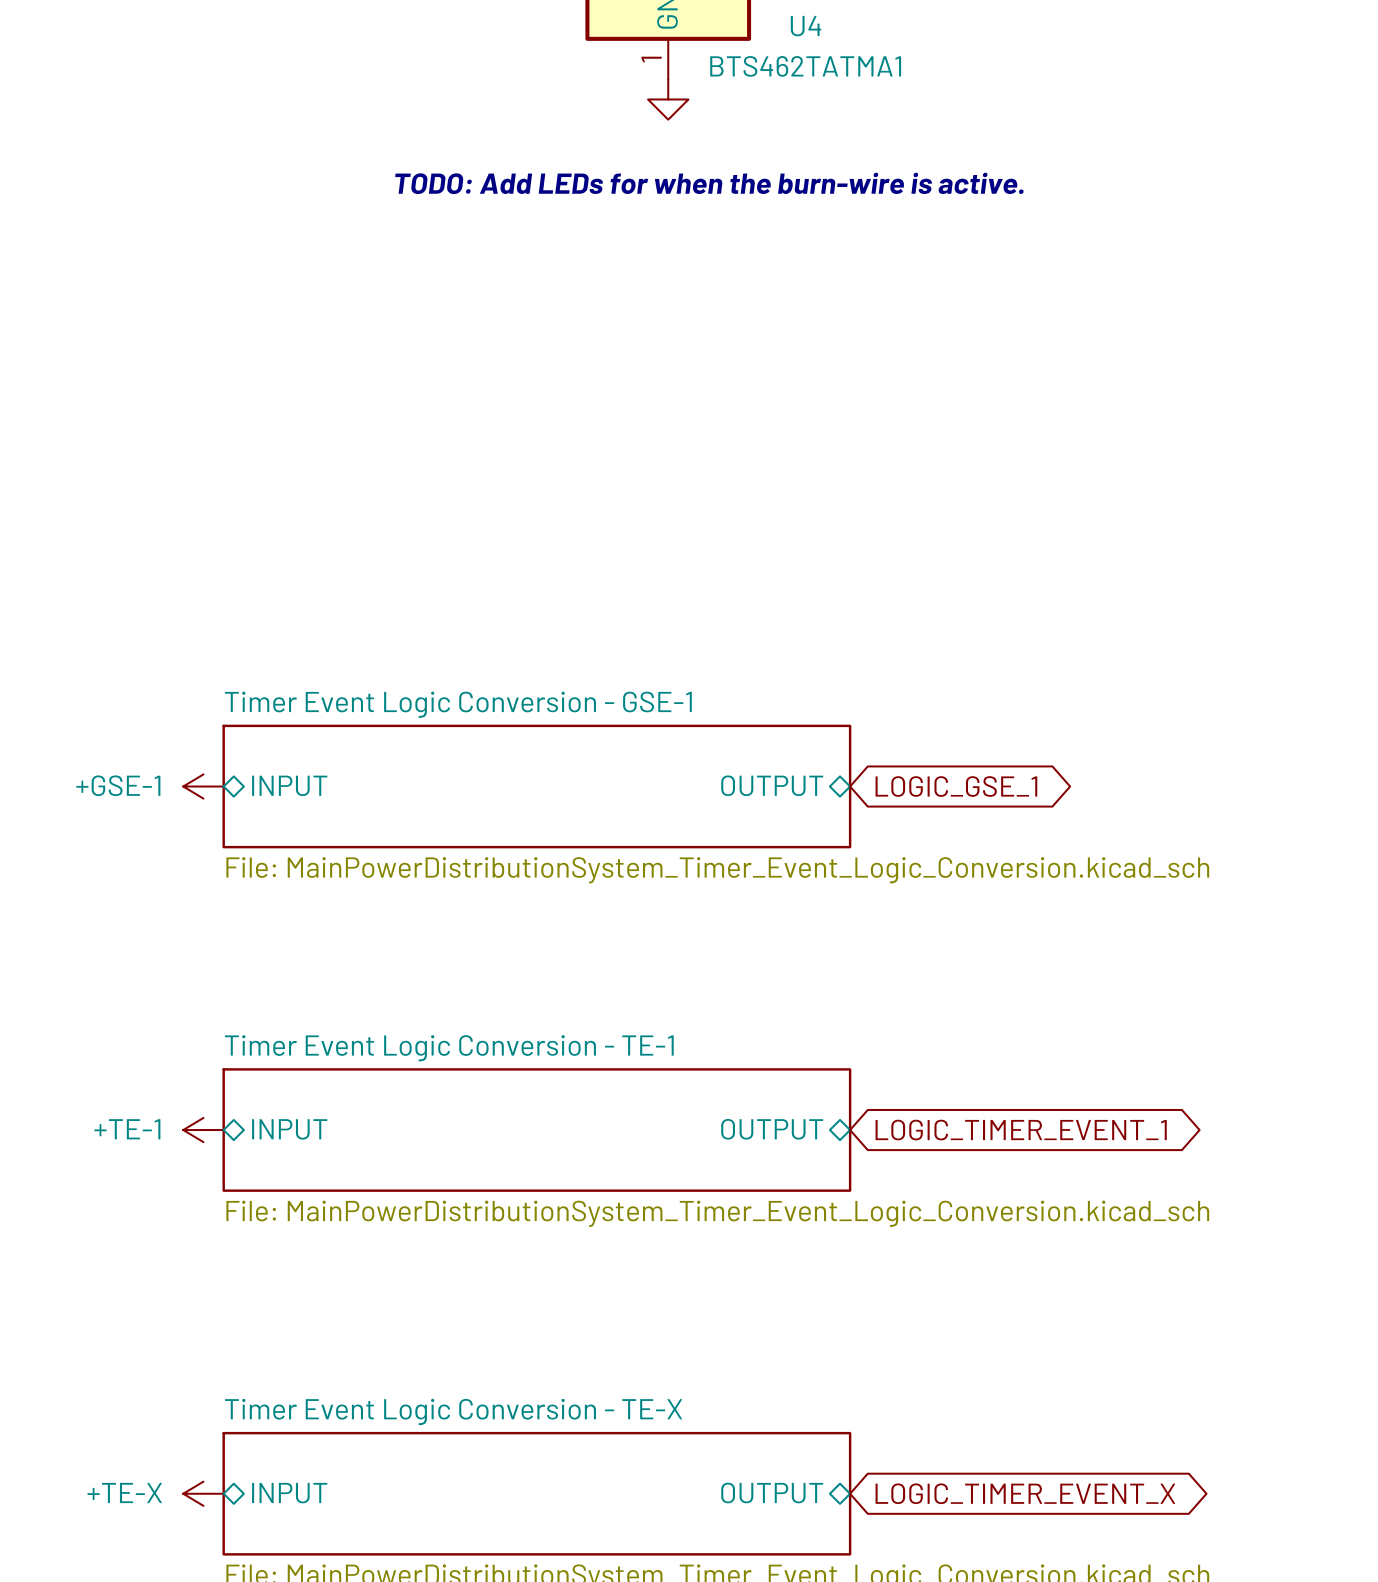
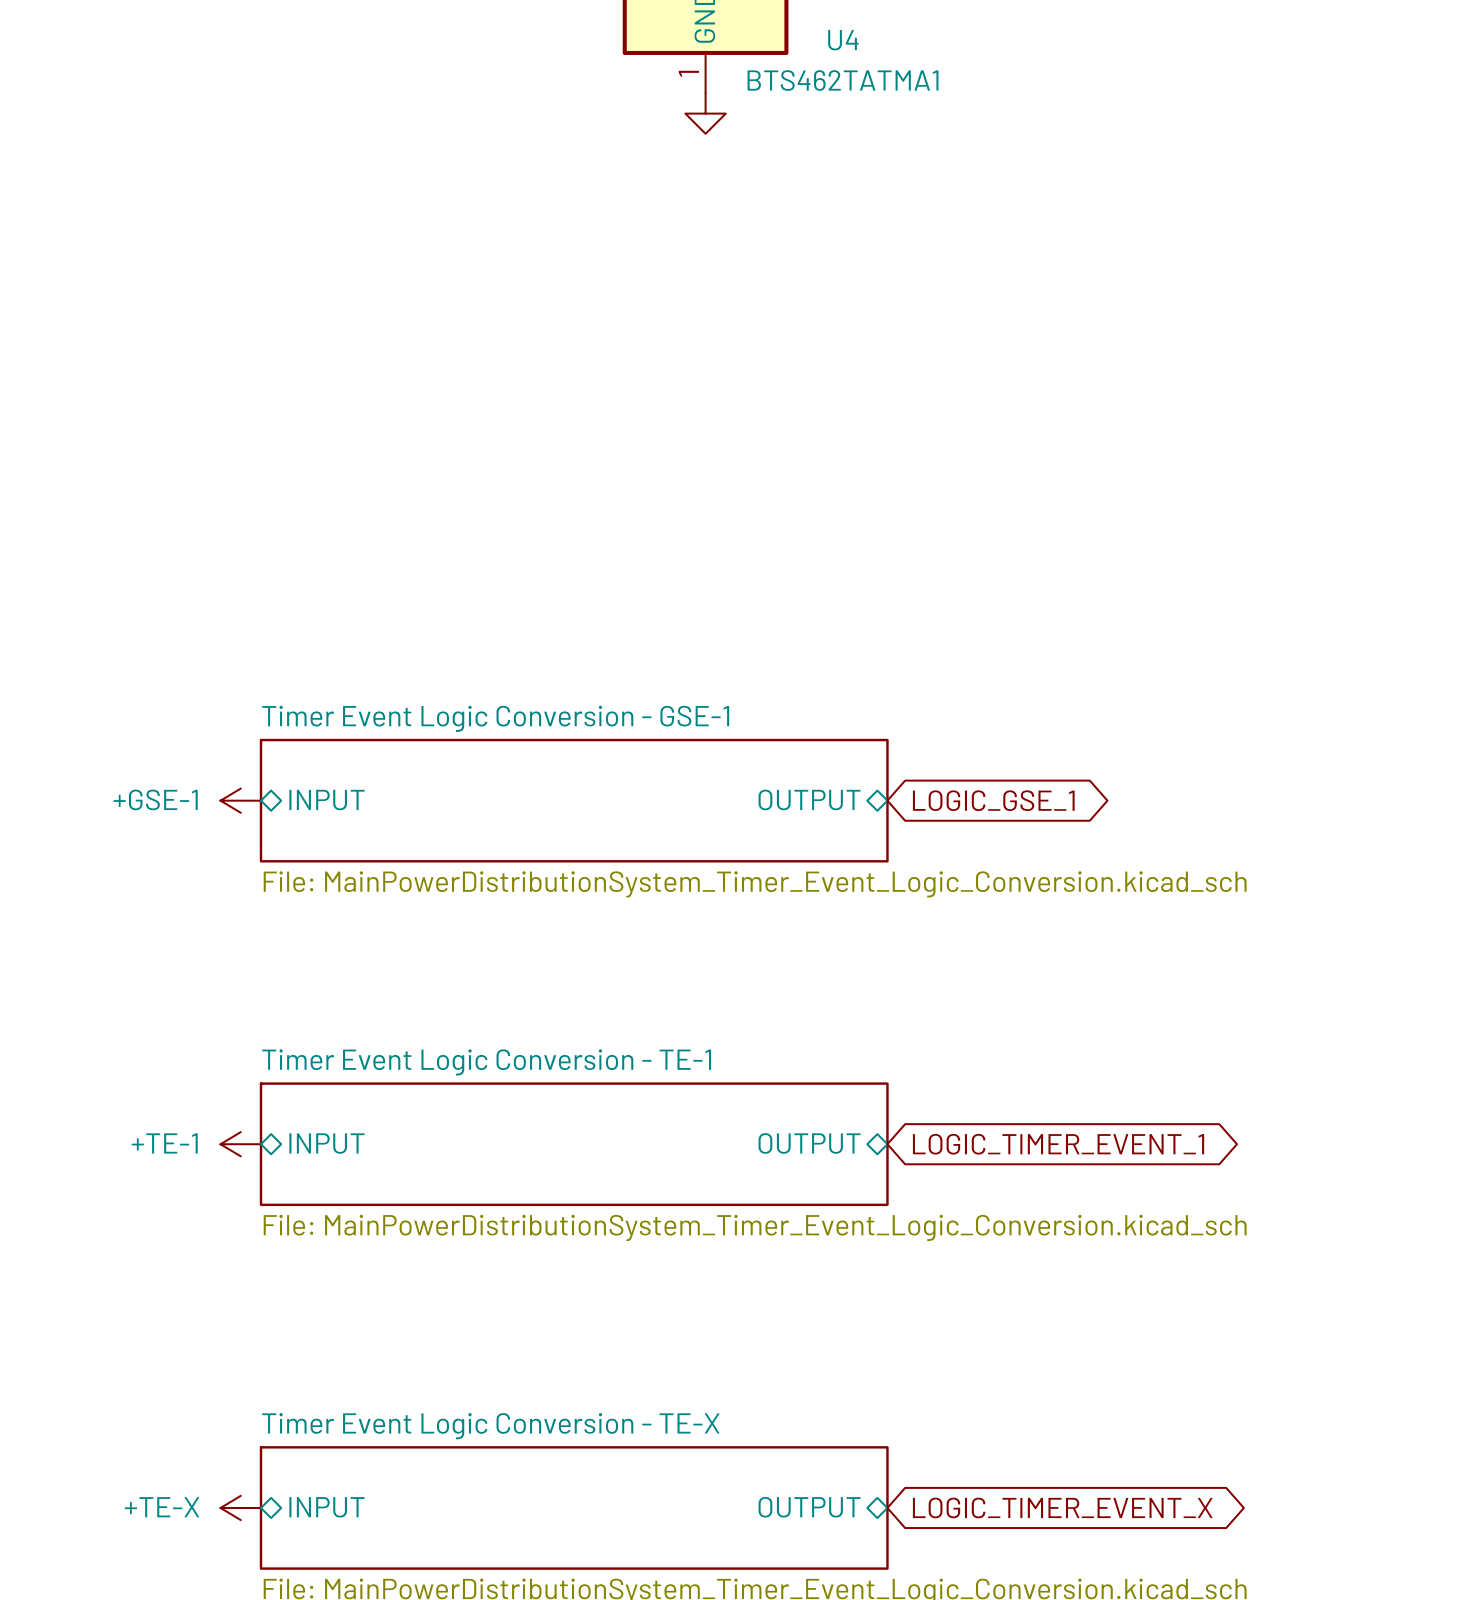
text: TODO: Add LEDs for when the burn-wire is active. (709, 183) -> none

